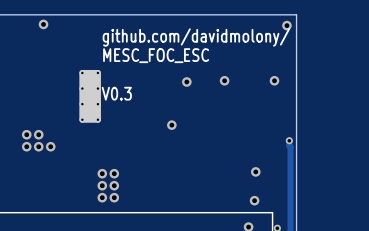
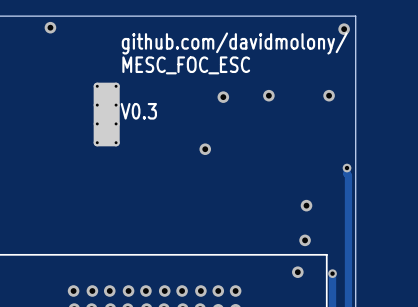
via: (26, 134) -> none
via: (38, 134) -> none
via: (26, 146) -> none
via: (38, 146) -> none
via: (50, 146) -> none
via: (102, 173) -> none
via: (114, 173) -> none
via: (102, 185) -> none
via: (114, 185) -> none
via: (102, 197) -> none
via: (114, 197) -> none

